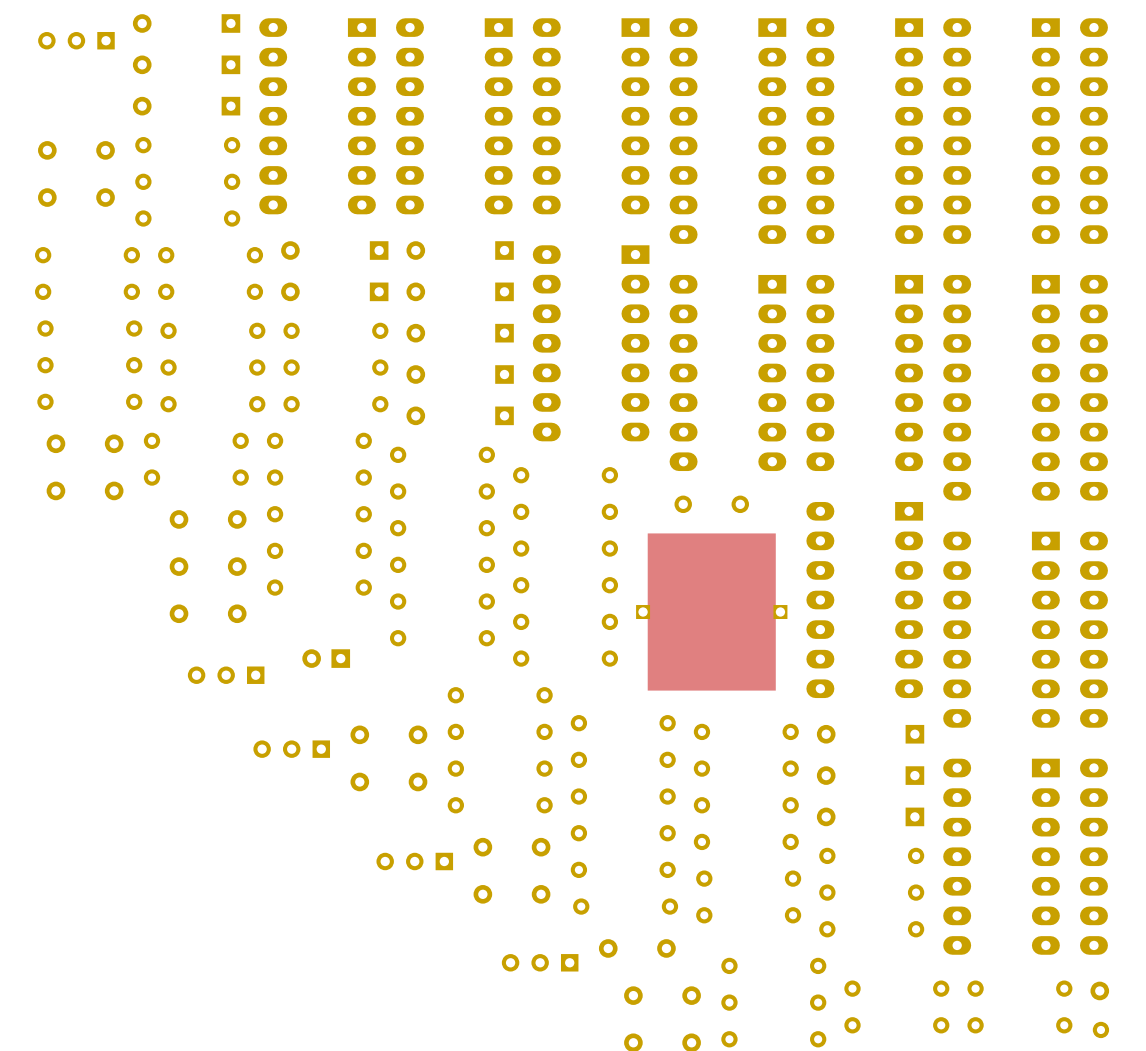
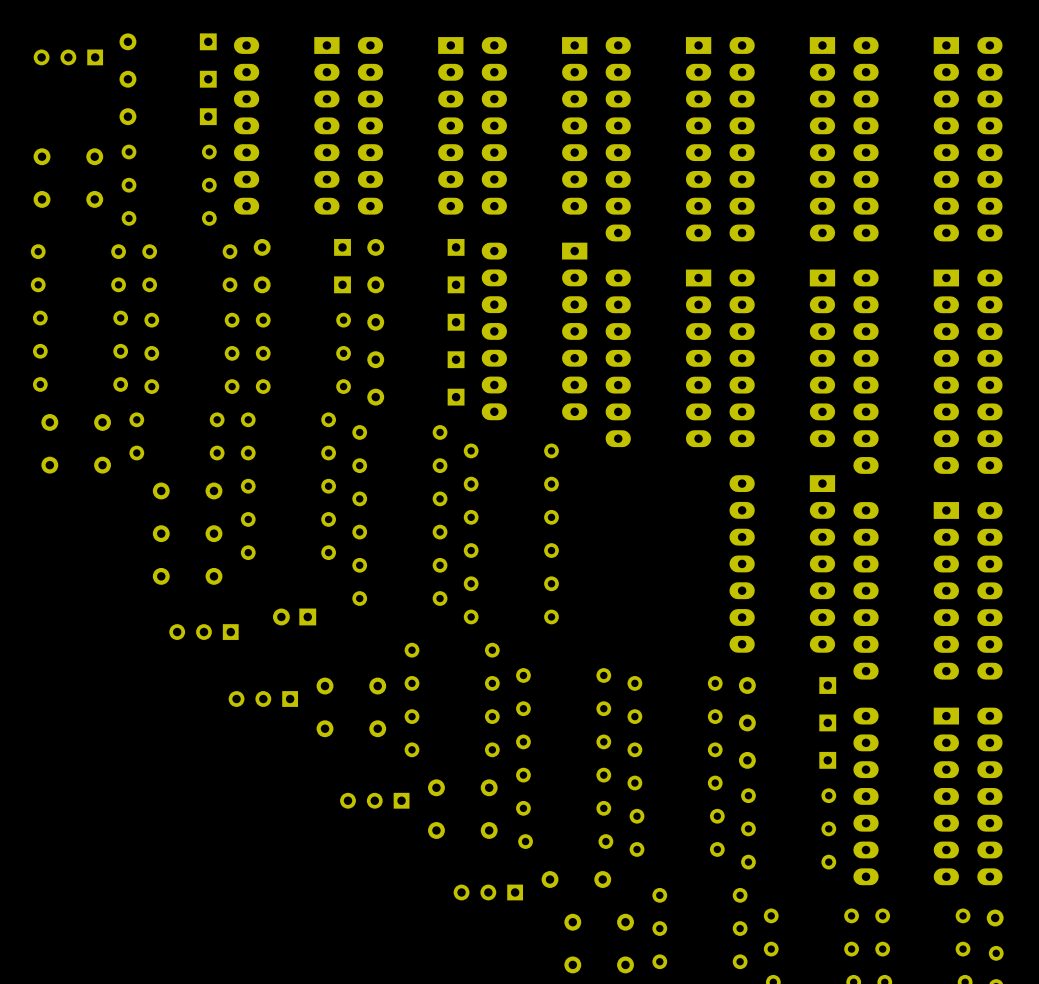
part: (711, 593) -> none

